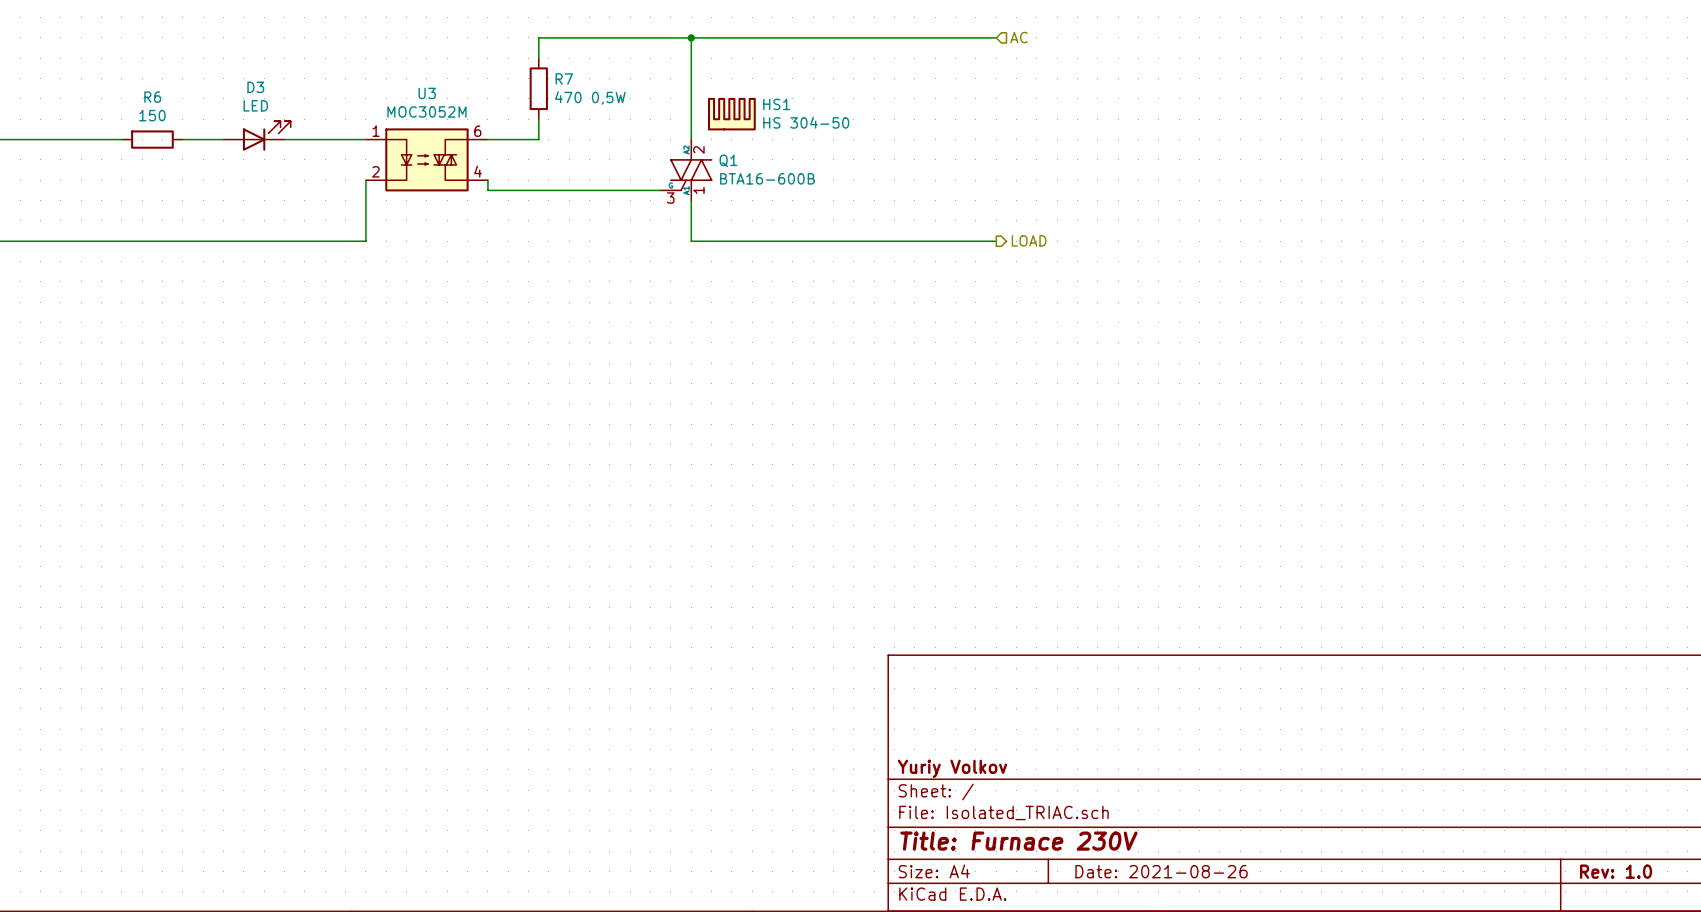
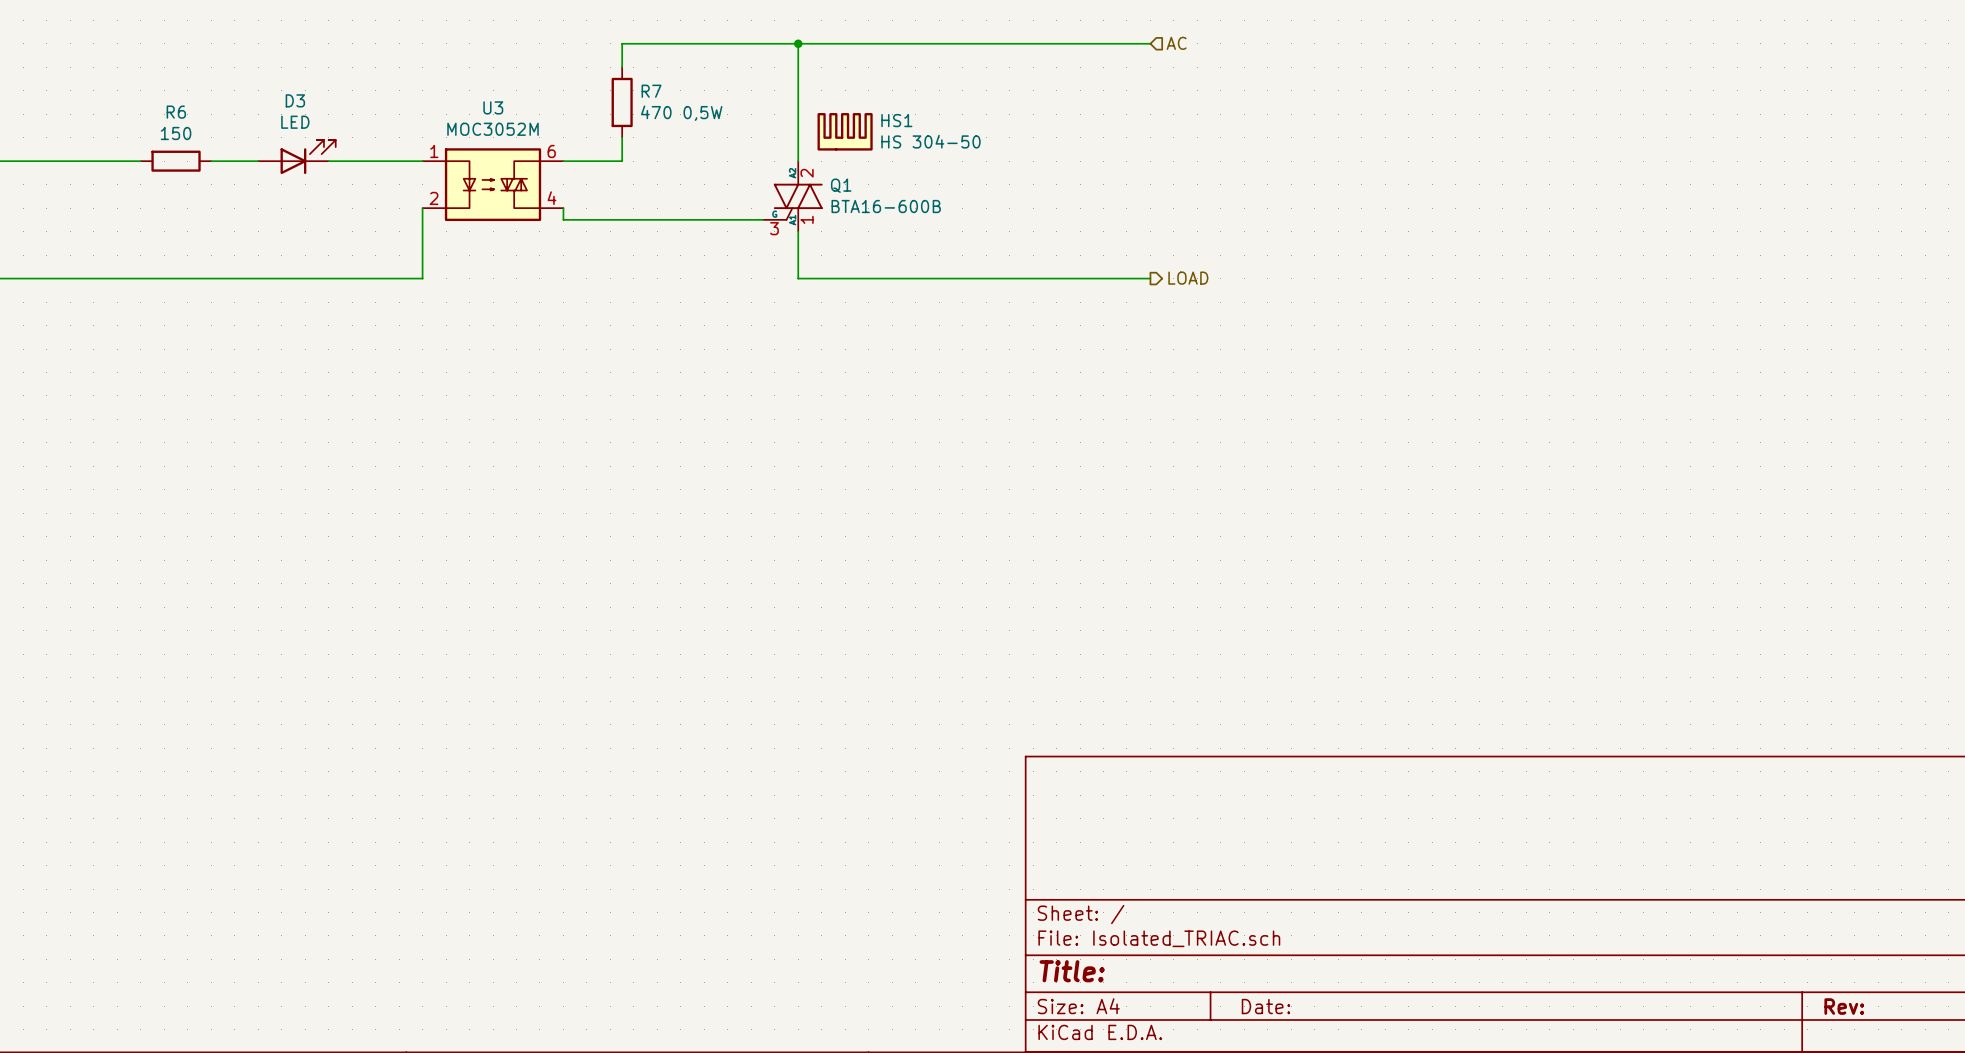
title block: Yuriy Volkov (952, 768) -> none
title block: Title: Furnace 230V (1018, 841) -> Title: (1072, 971)
title block: Date: 2021-08-26 (1161, 871) -> Date: (1265, 1006)
title block: Rev: 1.0 (1616, 871) -> Rev: (1844, 1006)

